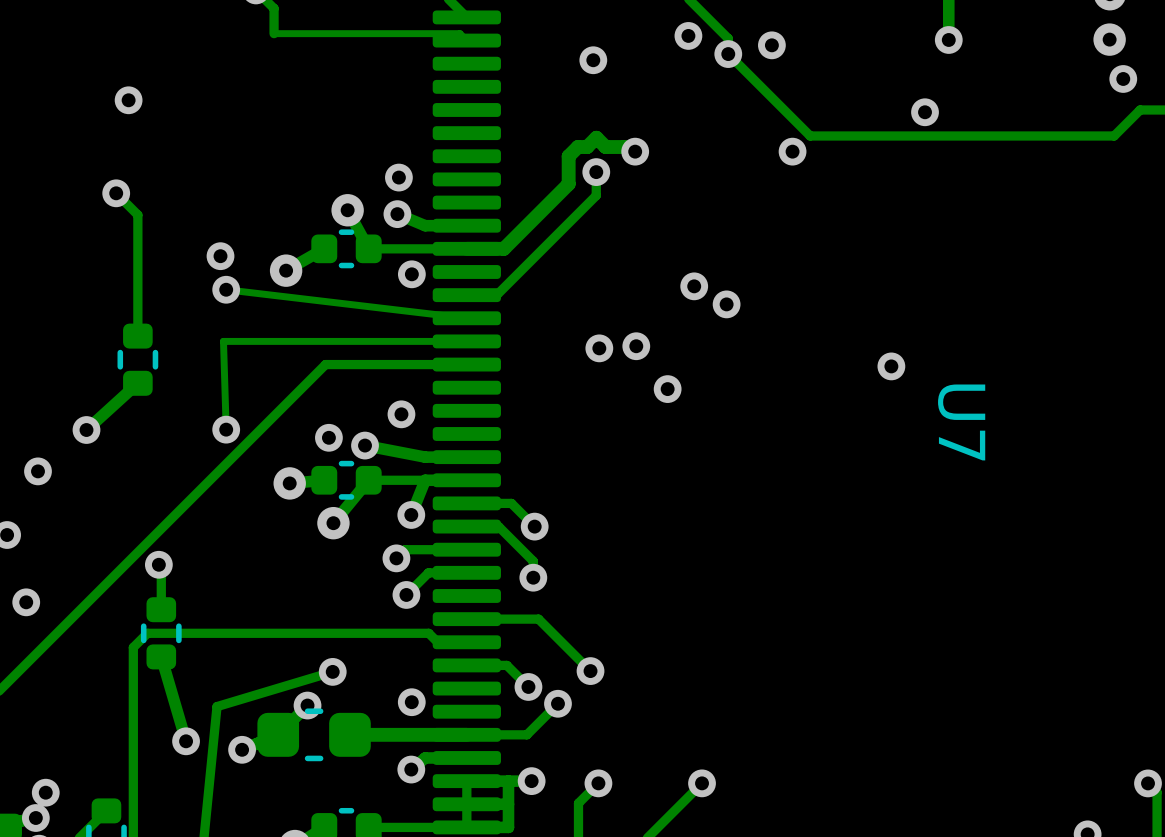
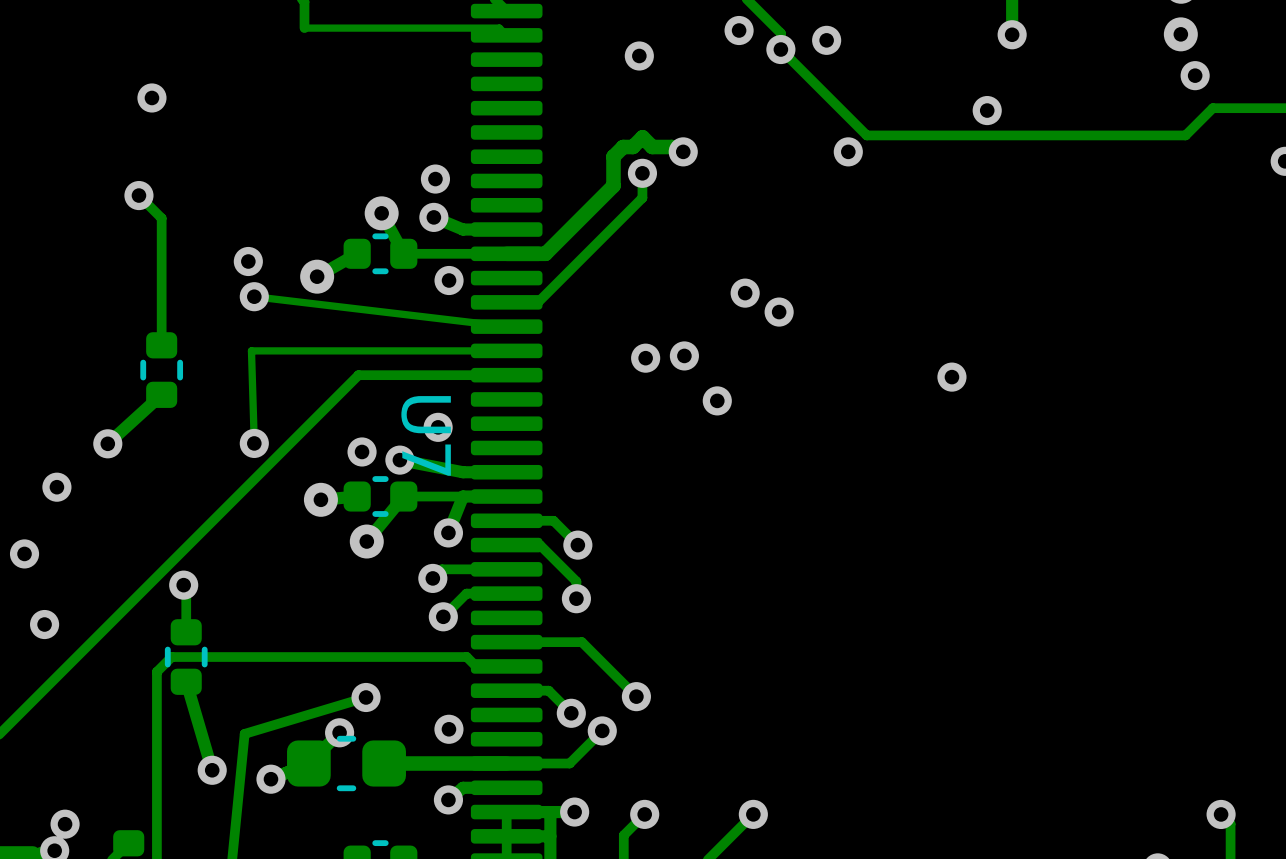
U7 name position: U7 (961, 422) -> U7 (426, 435)

